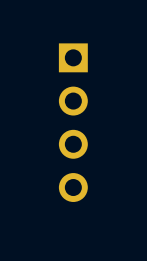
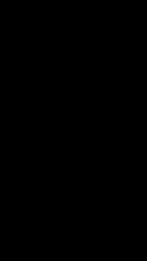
part: (73, 122) -> none

